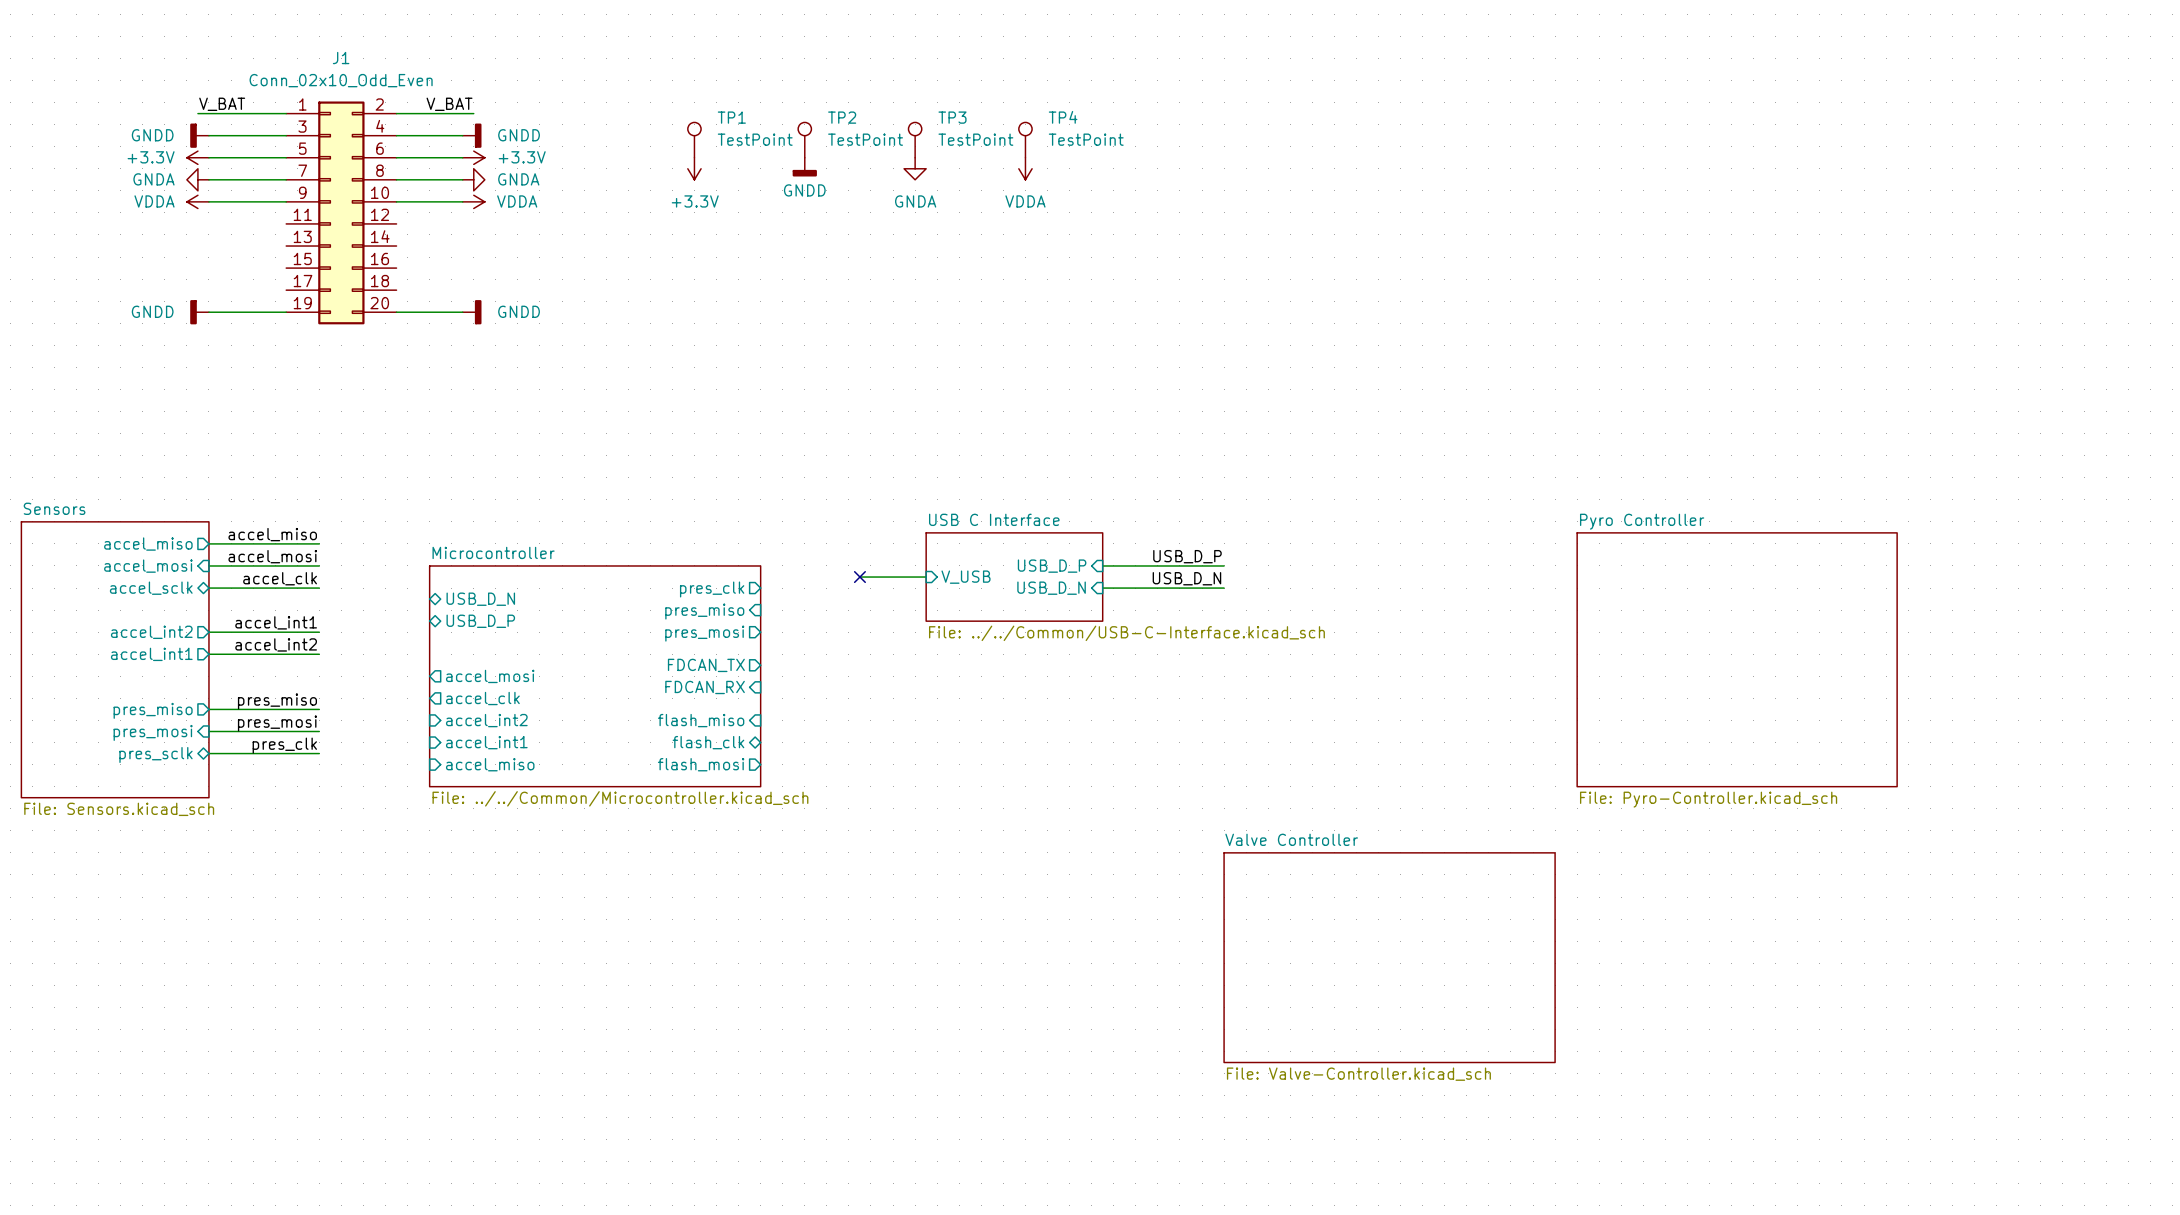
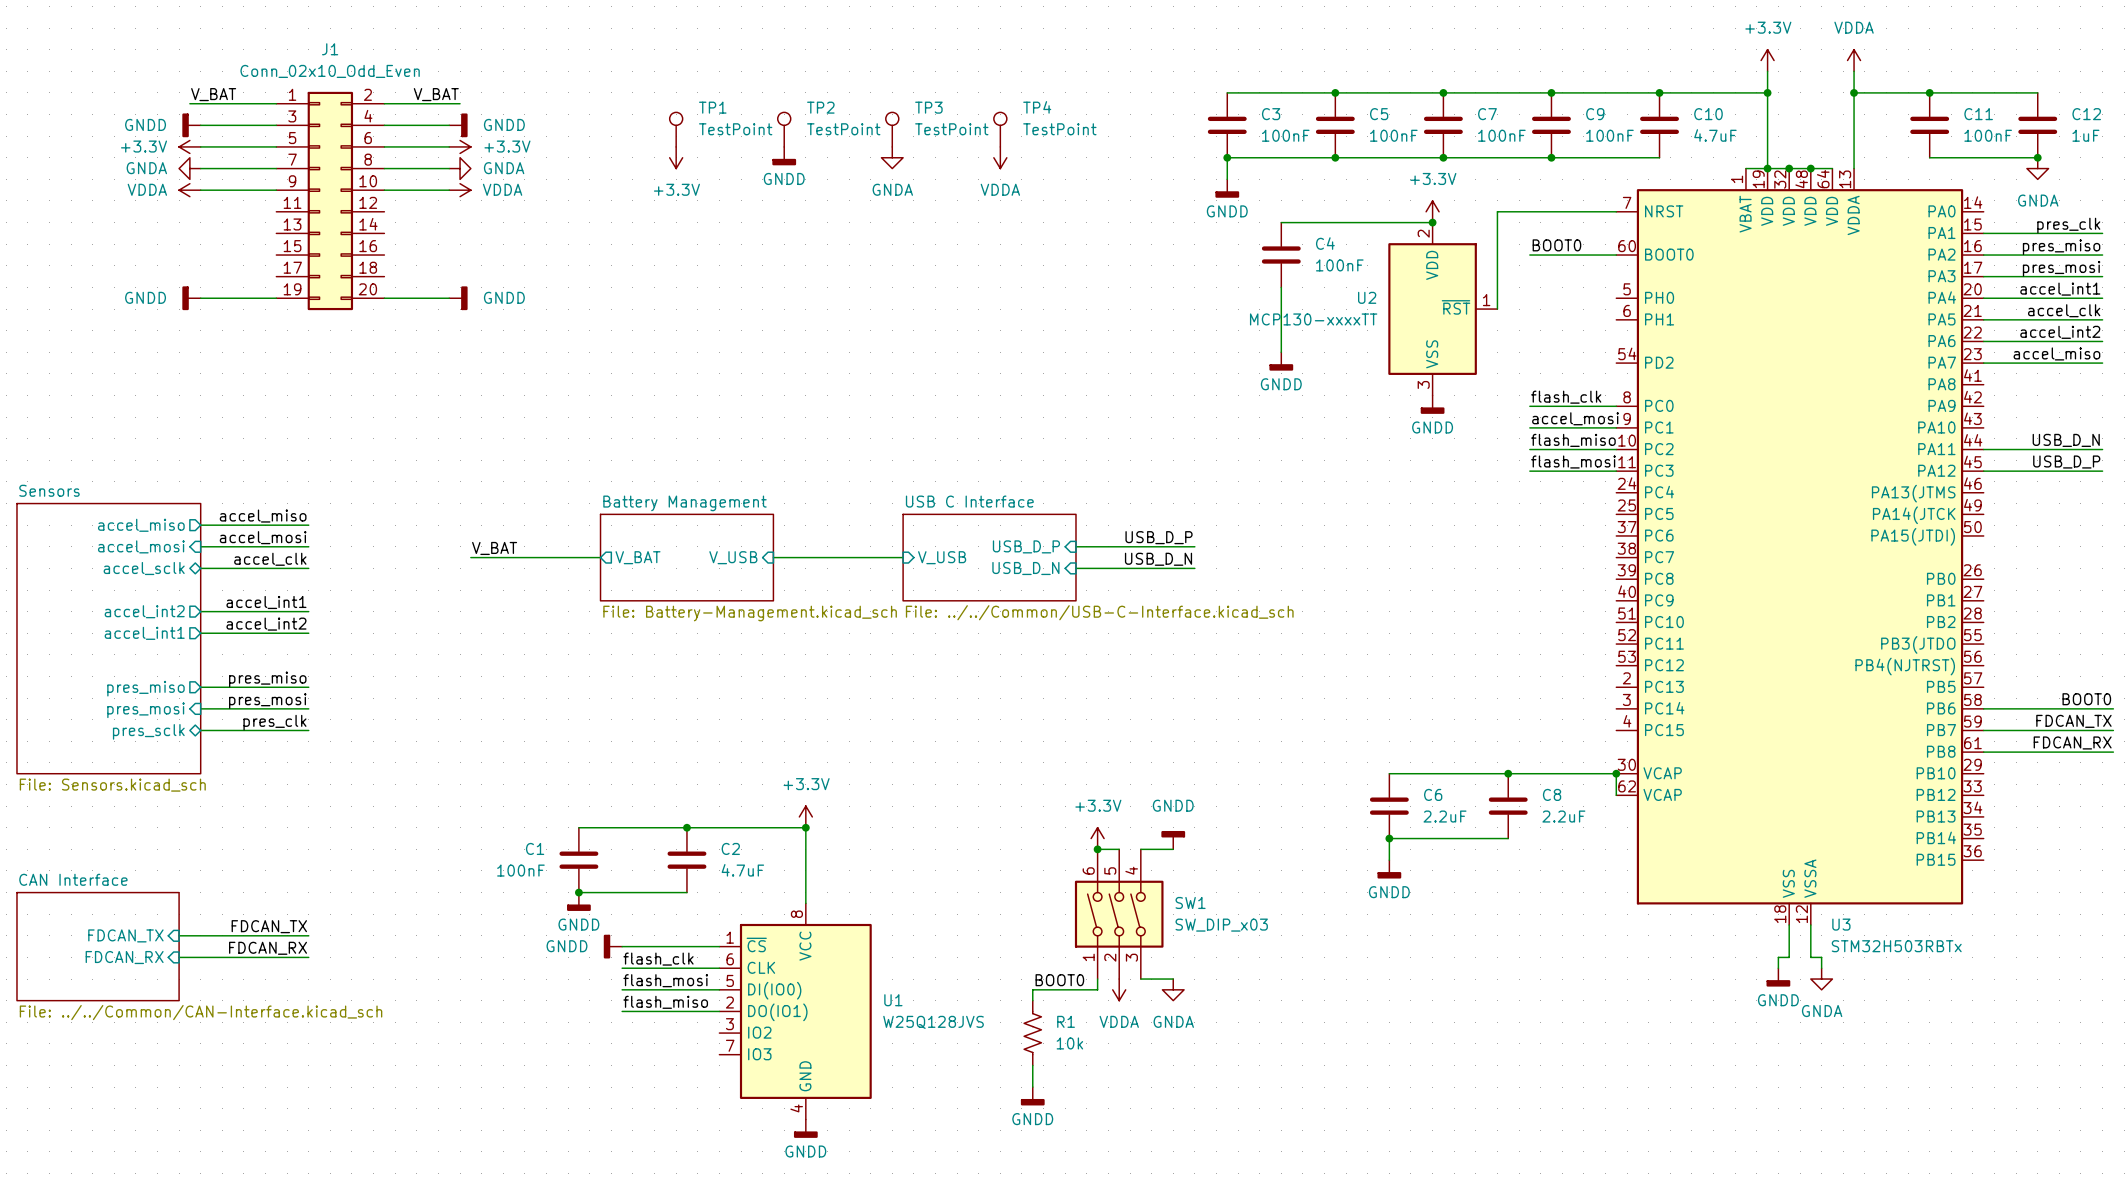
power symbol: none -> +3.3V (1767, 60)
power symbol: none -> VDDA (1854, 60)
wire: none -> (1767, 71) (1767, 168)
wire: none -> (1854, 71) (1854, 168)
wire: none -> (1227, 92) (1767, 92)
junction: none -> (1335, 92)
junction: none -> (1443, 92)
junction: none -> (1551, 92)
junction: none -> (1659, 92)
junction: none -> (1767, 92)
wire: none -> (1854, 92) (2037, 92)
junction: none -> (1854, 92)
junction: none -> (1929, 92)
C3: none -> 100nF (1227, 125)
C5: none -> 100nF (1335, 125)
C7: none -> 100nF (1443, 125)
C9: none -> 100nF (1551, 125)
C10: none -> 4.7uF (1659, 125)
C11: none -> 100nF (1929, 125)
C12: none -> 1uF (2037, 125)
junction: none -> (1227, 157)
junction: none -> (1335, 157)
junction: none -> (1443, 157)
junction: none -> (1551, 157)
wire: none -> (1659, 157) (1227, 157) (1227, 179)
wire: none -> (1929, 157) (2037, 157)
junction: none -> (2037, 157)
wire: none -> (1745, 168) (1832, 168)
junction: none -> (1767, 168)
junction: none -> (1789, 168)
junction: none -> (1810, 168)
power symbol: none -> GNDA (2037, 168)
power symbol: none -> GNDD (1227, 188)
power symbol: none -> +3.3V (1432, 211)
wire: none -> (1616, 211) (1497, 211) (1497, 309)
wire: none -> (1281, 222) (1432, 222)
junction: none -> (1432, 222)
label: none -> pres_clk (2068, 225)
wire: none -> (1983, 233) (2102, 233)
label: none -> BOOT0 (1556, 245)
label: none -> pres_miso (2061, 247)
C4: none -> 100nF (1281, 255)
wire: none -> (1529, 255) (1616, 255)
wire: none -> (1983, 255) (2102, 255)
label: none -> pres_mosi (2061, 268)
wire: none -> (1983, 276) (2102, 276)
wire: none -> (1281, 287) (1281, 352)
label: none -> accel_int1 (2060, 289)
wire: none -> (1983, 298) (2102, 298)
U2: none -> MCP130-xxxxTT (1442, 309)
label: none -> accel_clk (2064, 310)
wire: none -> (1983, 319) (2102, 319)
label: none -> accel_int2 (2060, 332)
wire: none -> (1983, 341) (2102, 341)
label: none -> accel_miso (2056, 353)
power symbol: none -> GNDD (1281, 361)
wire: none -> (1983, 363) (2102, 363)
label: none -> flash_clk (1566, 397)
power symbol: none -> GNDD (1432, 404)
wire: none -> (1529, 406) (1616, 406)
label: none -> accel_mosi (1575, 418)
wire: none -> (1529, 427) (1616, 427)
label: none -> flash_miso (1573, 440)
label: none -> USB_D_N (2066, 440)
wire: none -> (1529, 449) (1616, 449)
wire: none -> (1983, 449) (2102, 449)
label: none -> flash_mosi (1573, 462)
label: none -> USB_D_P (2066, 462)
wire: none -> (1529, 471) (1616, 471)
wire: none -> (1983, 471) (2102, 471)
U3: none -> STM32H503RBTx (1800, 546)
label: none -> V_BAT (494, 548)
wire: none -> (470, 557) (600, 557)
sheet pin: none -> V_BAT (637, 557)
sheet Battery Management: none -> File: Battery-Management.kicad_sch (686, 557)
sheet pin: none -> V_USB (733, 557)
wire: none -> (773, 557) (838, 557)
no-connect mark: (859, 577) -> none
sheet pin: pres_clk (712, 589) -> none
sheet pin: USB_D_N (480, 599) -> none
sheet pin: pres_miso (704, 611) -> none
sheet pin: USB_D_P (480, 621) -> none
sheet pin: pres_mosi (704, 633) -> none
sheet Pyro Controller: File: Pyro-Controller.kicad_sch (1737, 659) -> none
sheet pin: FDCAN_TX (706, 665) -> none
sheet pin: accel_mosi (490, 676) -> none
sheet Microcontroller: File: ../../Common/Microcontroller.kicad_sch (595, 676) -> none
sheet pin: FDCAN_RX (705, 687) -> none
sheet pin: accel_clk (482, 698) -> none
sheet pin: accel_int2 (486, 720) -> none
sheet pin: flash_miso (701, 720) -> none
label: none -> BOOT0 (2086, 699)
wire: none -> (1983, 708) (2113, 708)
sheet pin: accel_int1 (486, 742) -> none
sheet pin: flash_clk (708, 742) -> none
label: none -> FDCAN_TX (2073, 721)
wire: none -> (1983, 730) (2113, 730)
sheet pin: accel_miso (490, 764) -> none
sheet pin: flash_mosi (701, 764) -> none
label: none -> FDCAN_RX (2072, 742)
wire: none -> (1983, 752) (2113, 752)
wire: none -> (1389, 773) (1616, 773) (1616, 795)
junction: none -> (1508, 773)
junction: none -> (1616, 773)
C6: none -> 2.2uF (1389, 806)
C8: none -> 2.2uF (1508, 806)
power symbol: none -> +3.3V (805, 816)
wire: none -> (578, 827) (805, 827) (805, 903)
junction: none -> (686, 827)
junction: none -> (805, 827)
power symbol: none -> +3.3V (1097, 838)
junction: none -> (1389, 838)
wire: none -> (1508, 838) (1389, 838) (1389, 860)
power symbol: none -> GNDD (1173, 840)
wire: none -> (1097, 849) (1119, 849)
junction: none -> (1097, 849)
wire: none -> (1140, 849) (1173, 849)
C1: none -> 100nF (578, 860)
C2: none -> 4.7uF (686, 860)
power symbol: none -> GNDD (1389, 869)
wire: none -> (578, 892) (686, 892)
junction: none -> (578, 892)
power symbol: none -> GNDD (578, 901)
SW1: none -> SW_DIP_x03 (1119, 914)
wire: none -> (1789, 925) (1789, 957) (1778, 957) (1778, 968)
wire: none -> (1810, 925) (1810, 957) (1821, 957) (1821, 968)
label: none -> FDCAN_TX (269, 926)
sheet Valve Controller: File: Valve-Controller.kicad_sch (1389, 957) -> none
sheet pin: none -> FDCAN_TX (125, 935)
wire: none -> (179, 935) (308, 935)
sheet CAN Interface: none -> File: ../../Common/CAN-Interface.kicad_sch (98, 946)
power symbol: none -> GNDD (612, 946)
wire: none -> (622, 946) (719, 946)
label: none -> FDCAN_RX (268, 948)
sheet pin: none -> FDCAN_RX (124, 957)
wire: none -> (179, 957) (308, 957)
label: none -> flash_clk (658, 959)
wire: none -> (622, 968) (719, 968)
power symbol: none -> GNDD (1778, 977)
wire: none -> (1097, 979) (1097, 989) (1032, 989) (1032, 1000)
wire: none -> (1140, 979) (1173, 979)
power symbol: none -> GNDA (1821, 979)
label: none -> BOOT0 (1059, 980)
label: none -> flash_mosi (665, 980)
wire: none -> (622, 989) (719, 989)
power symbol: none -> VDDA (1119, 989)
power symbol: none -> GNDA (1173, 989)
label: none -> flash_miso (665, 1002)
wire: none -> (622, 1011) (719, 1011)
U1: none -> W25Q128JVS (795, 1011)
R1: none -> 10k (1032, 1033)
wire: none -> (1032, 1065) (1032, 1087)
power symbol: none -> GNDD (1032, 1096)
power symbol: none -> GNDD (805, 1128)

